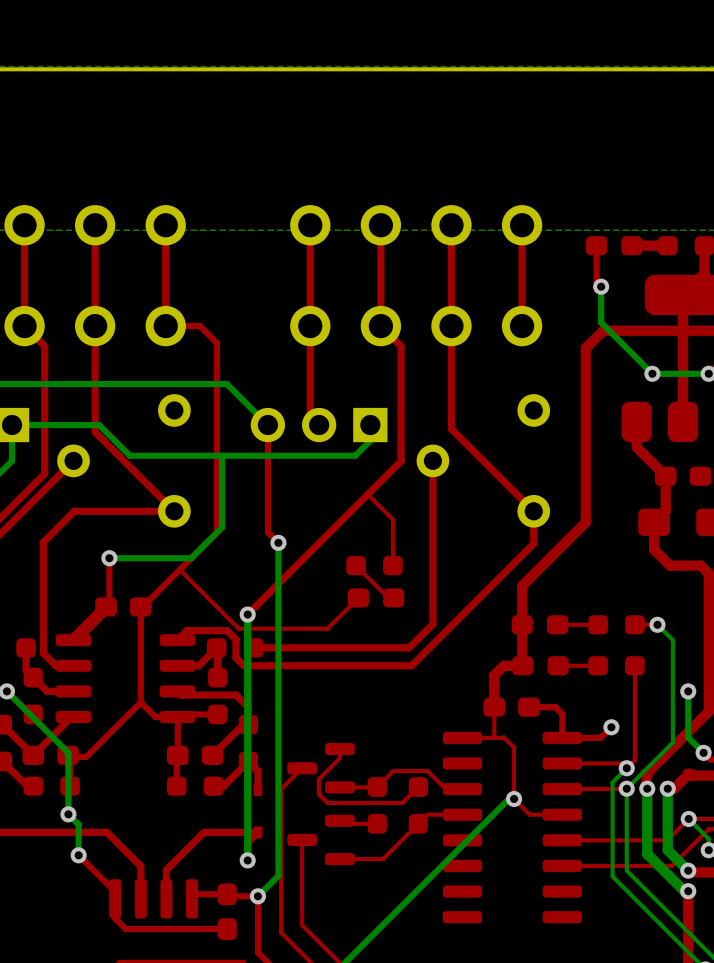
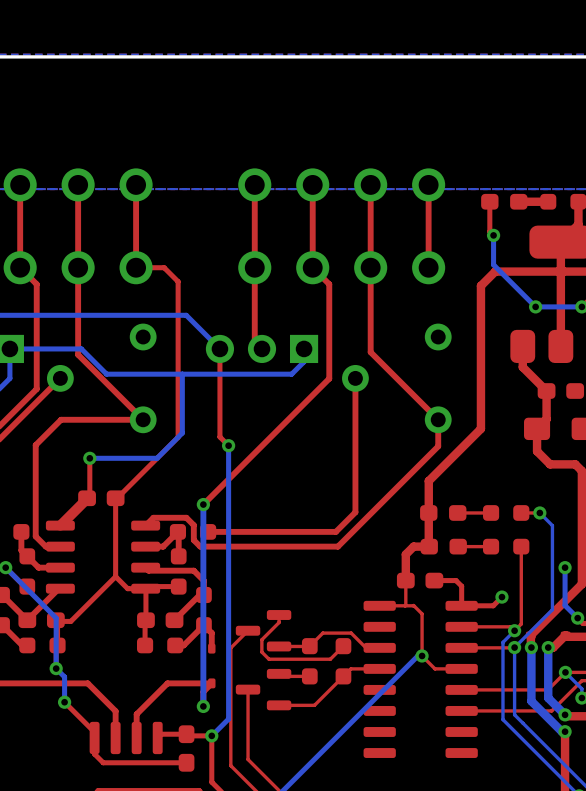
top track: (367, 494) (392, 519) (392, 565) -> none
top track: (356, 565) (388, 597) (393, 597) -> none
part: (374, 565) -> none
top track: (179, 570) (238, 628) (327, 628) (358, 597) -> none
part: (376, 597) -> none

